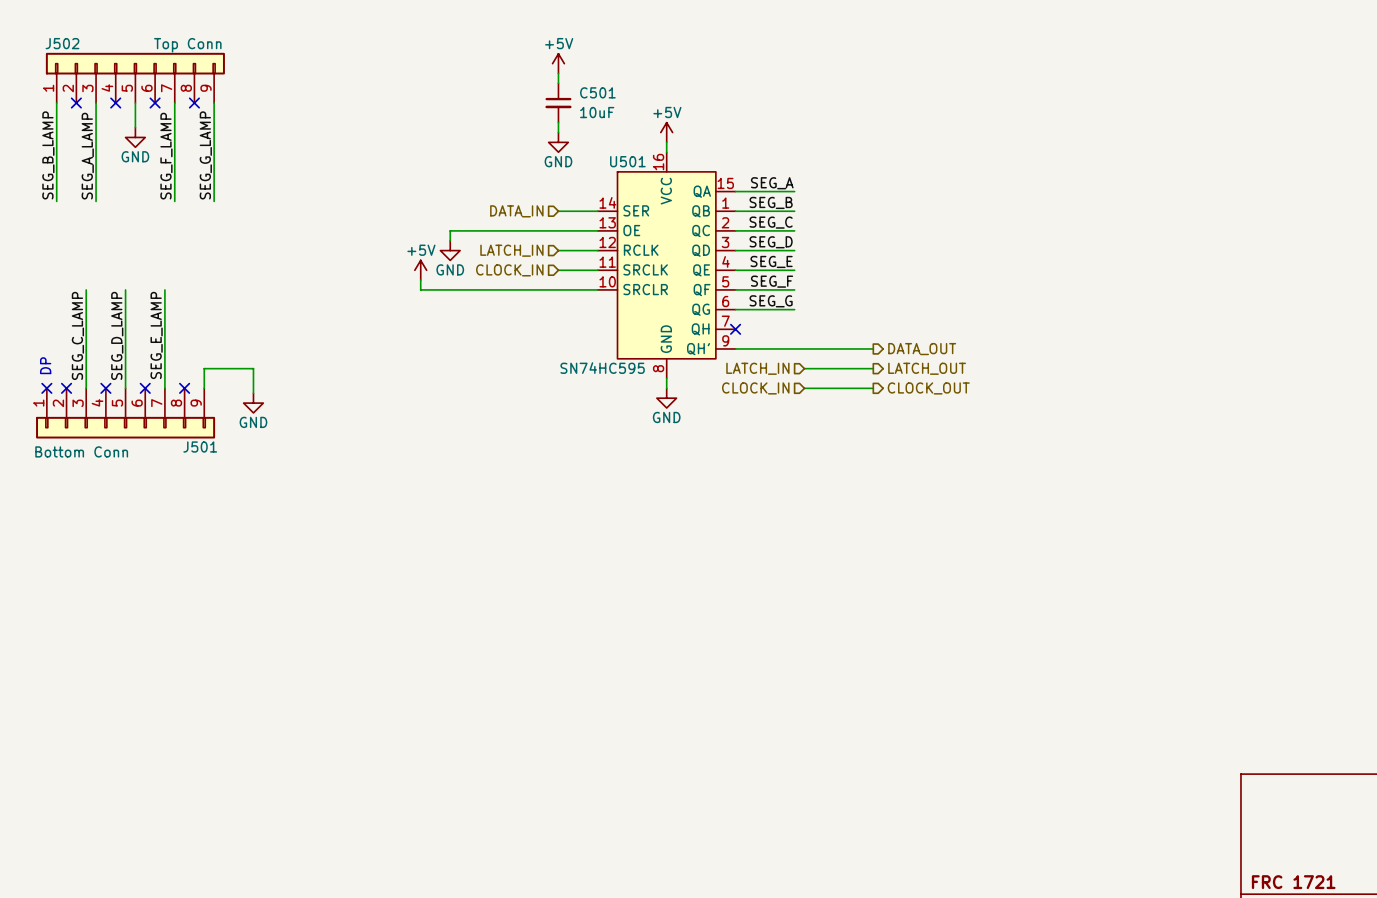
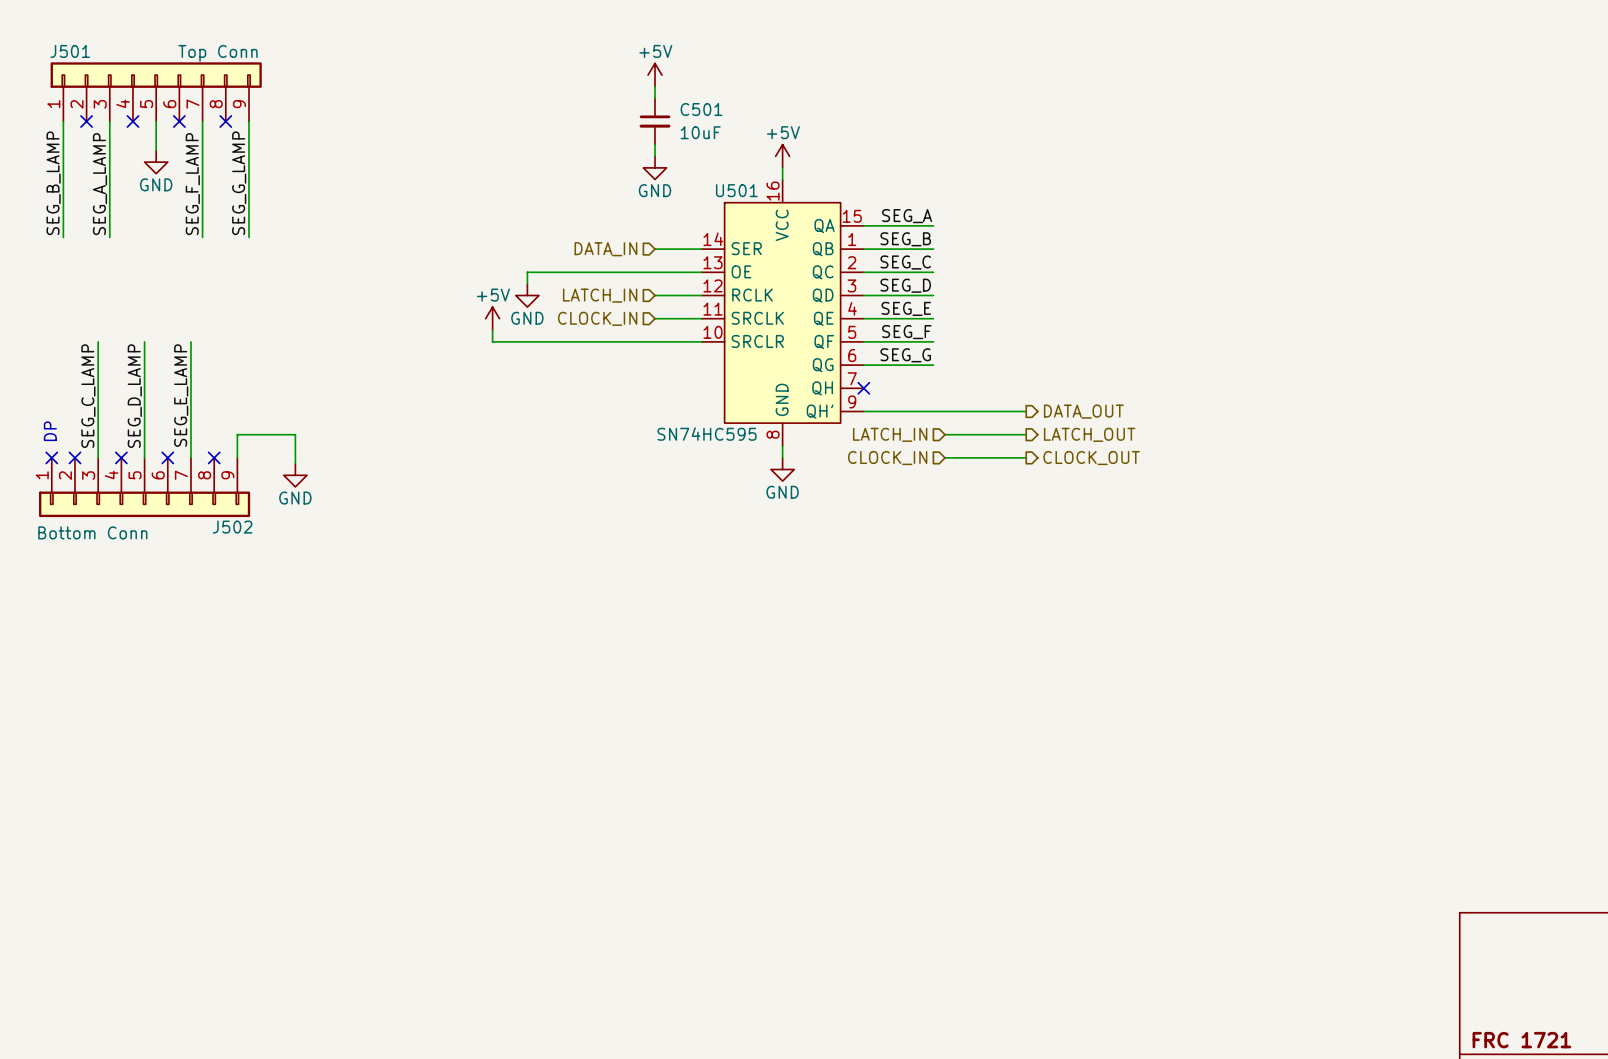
J502 name: J502 (62, 43) -> J501 (70, 51)
J501 name: J501 (200, 447) -> J502 (232, 527)

